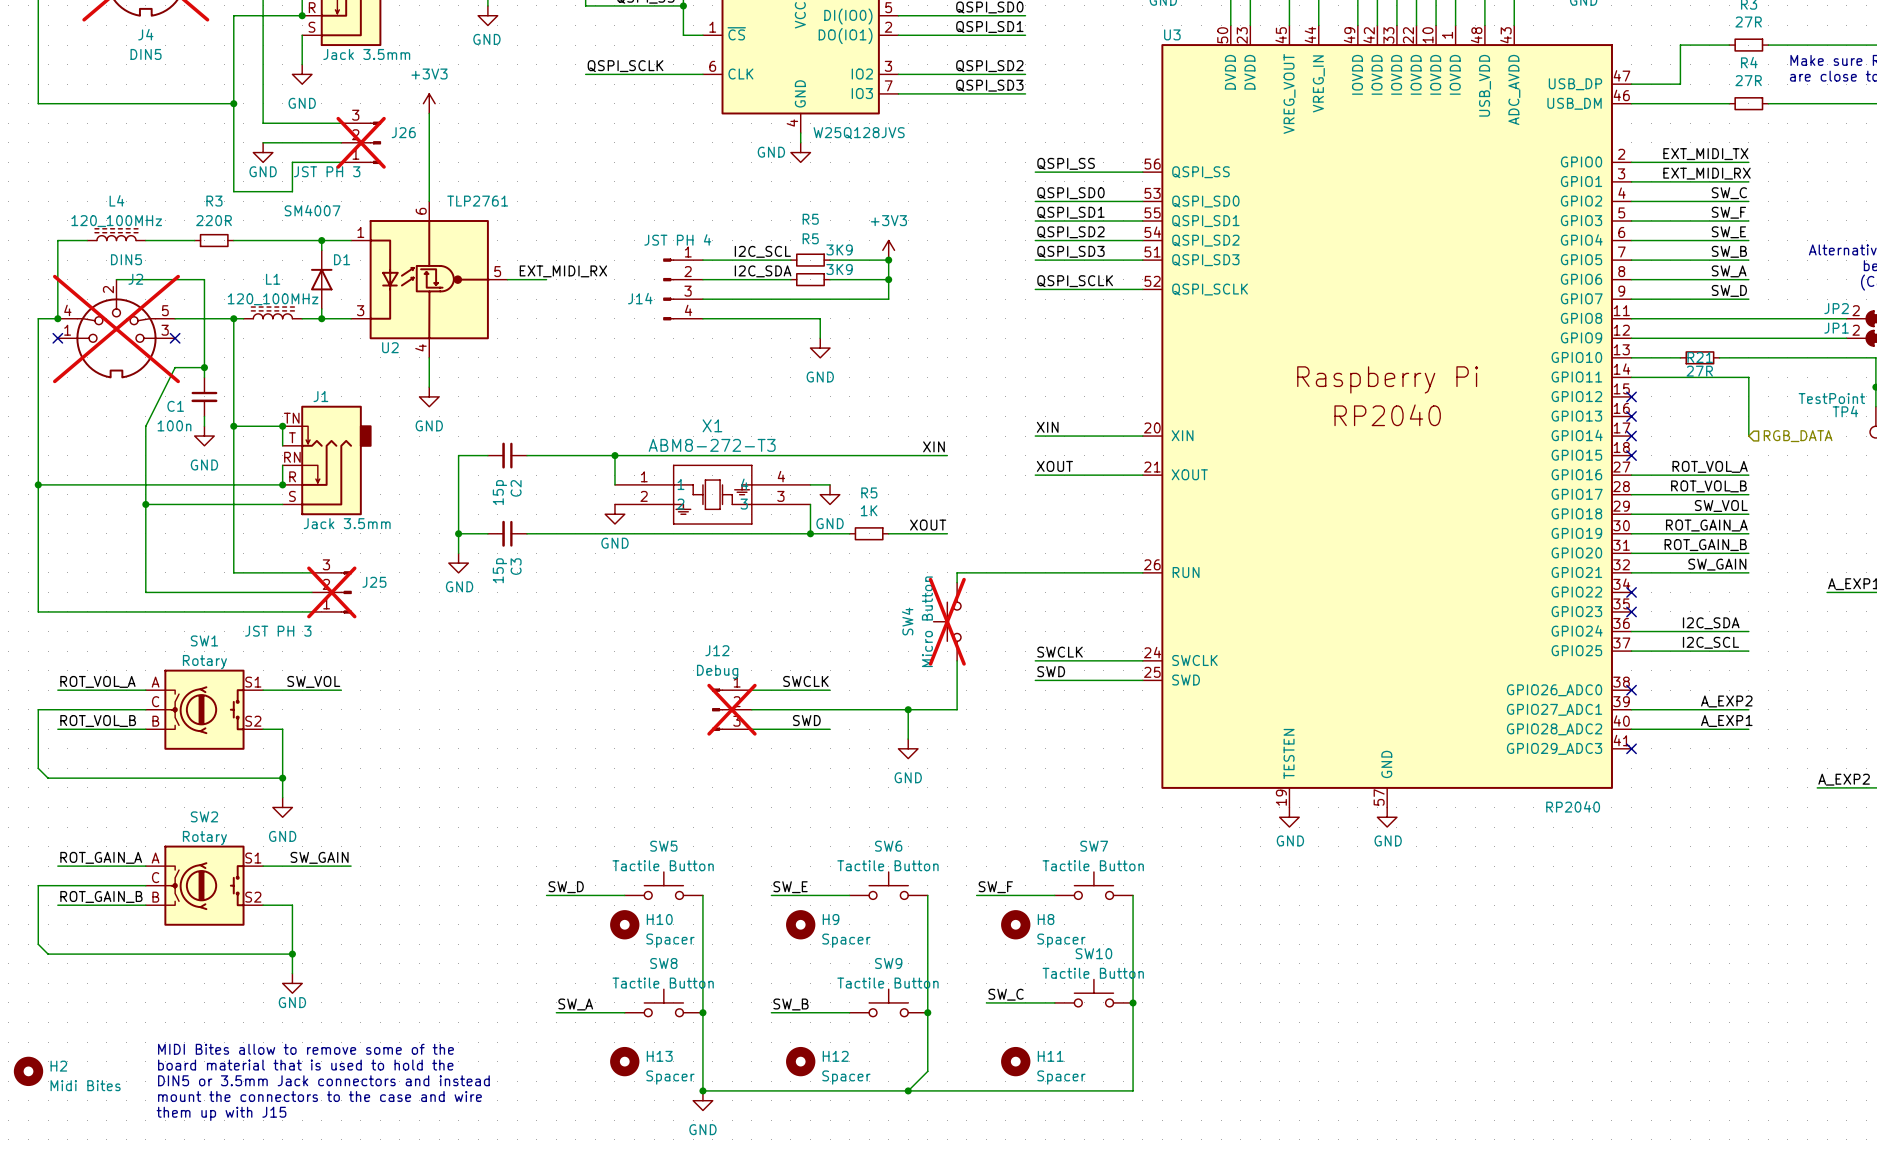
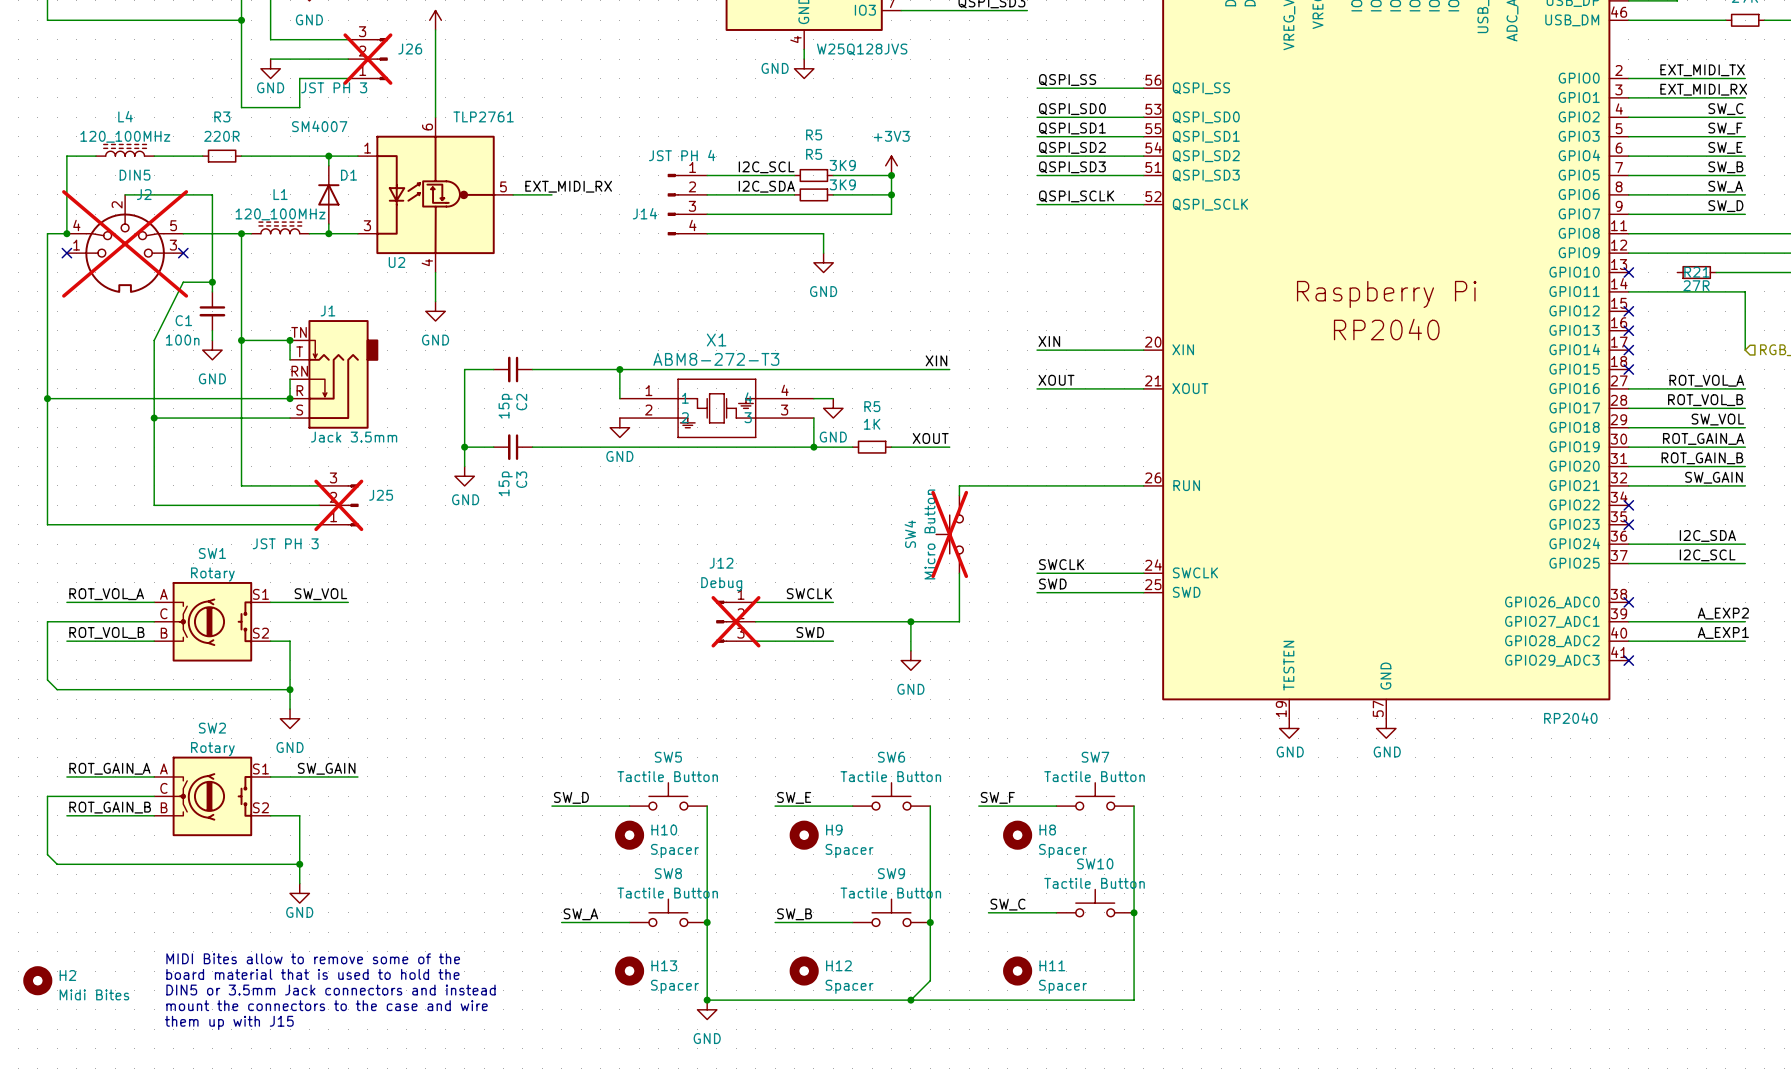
wire: (1631, 357) (1680, 357) -> none
no-connect mark: none -> (1628, 272)

